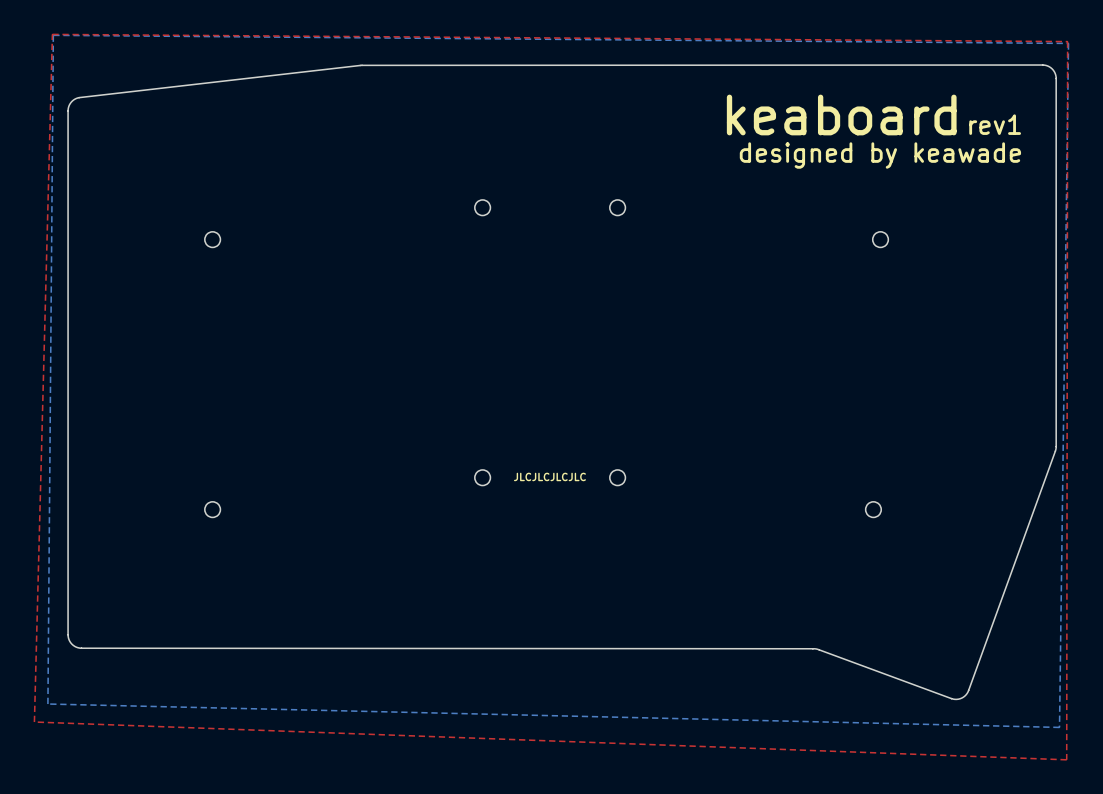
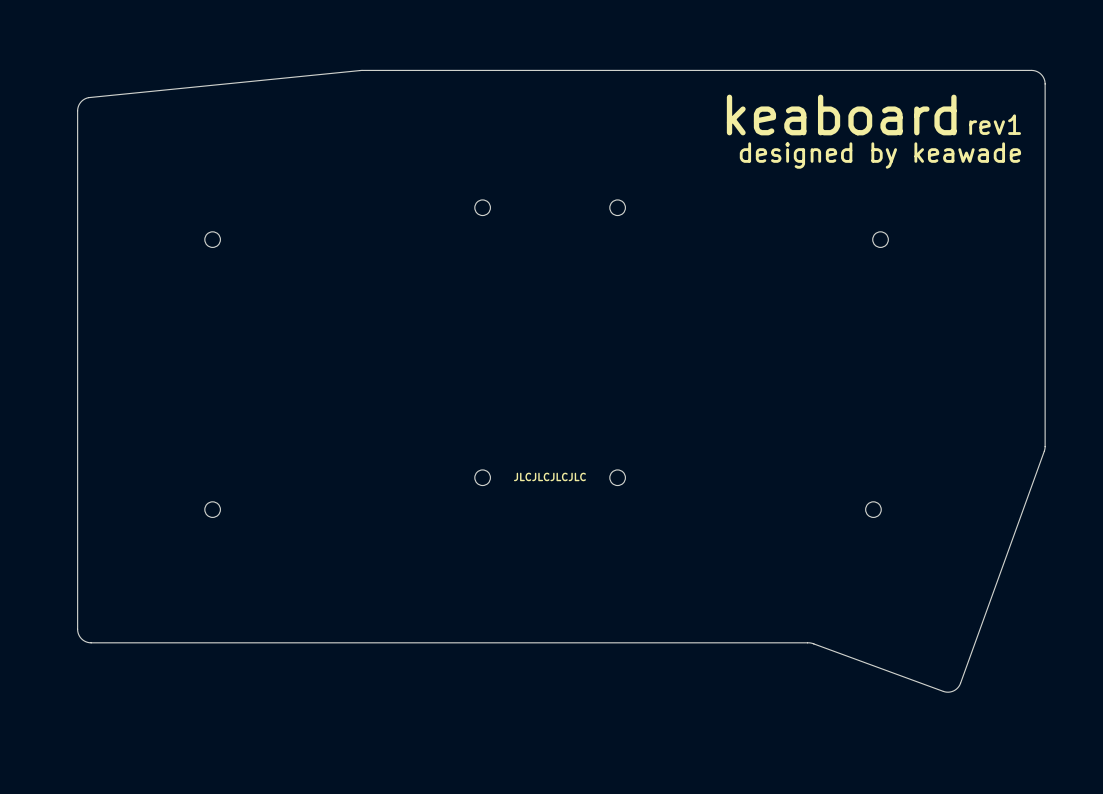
top zone outline: (52, 34) (34, 722) (1066, 759) (1067, 41) (52, 34) -> none
bottom zone outline: (53, 35) (47, 704) (1059, 727) (1068, 43) (53, 35) -> none
board edge: (1042, 65) (361, 65) (74, 99) (69, 104) (68, 110) (68, 634) (69, 641) (74, 646) (81, 648) (814, 648) (951, 698) (963, 697) (968, 690) (1056, 447) (1056, 78) (1052, 68) (1042, 65) -> (362, 70) (88, 97) (79, 104) (77, 629) (81, 638) (91, 642) (809, 642) (943, 691) (950, 691) (956, 689) (960, 683) (1044, 448) (1045, 83) (1041, 74) (1031, 70) (362, 70)

